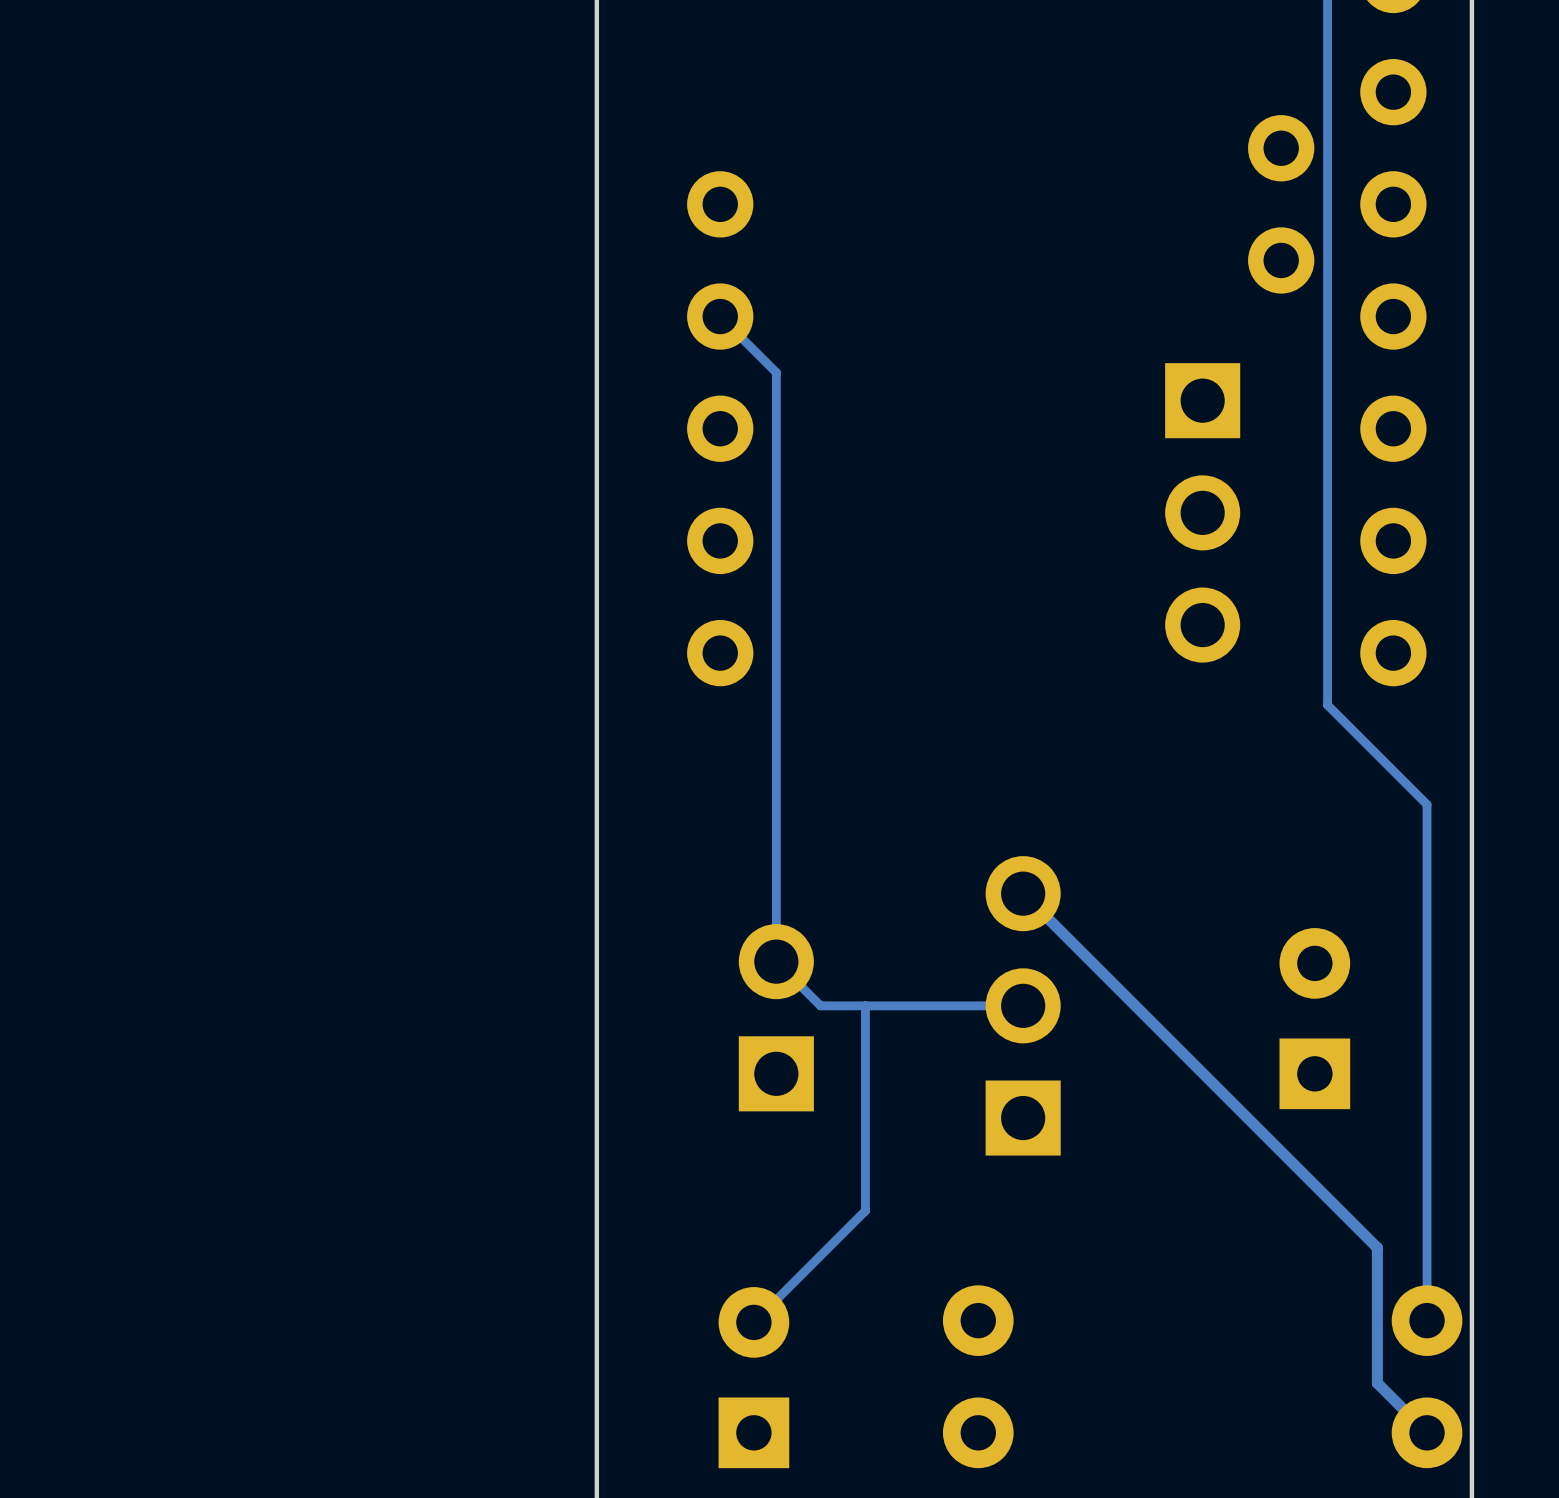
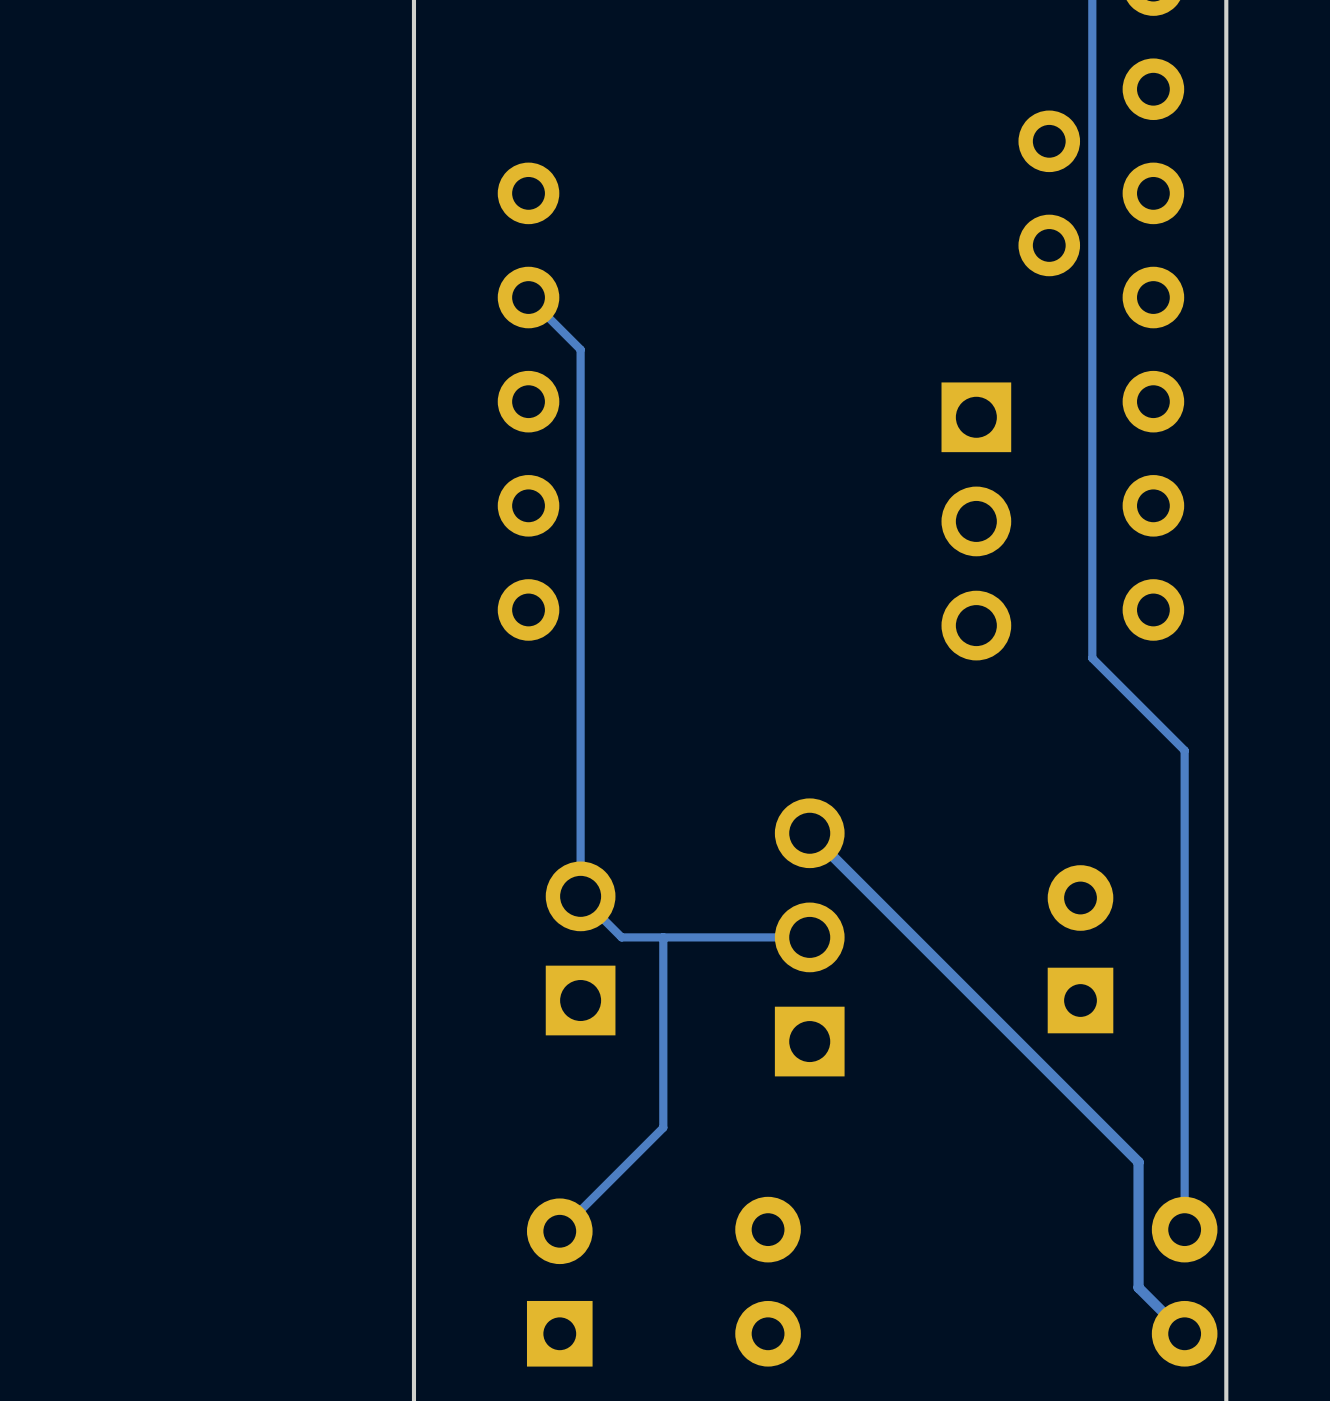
part position: (1202, 512) -> (976, 521)

